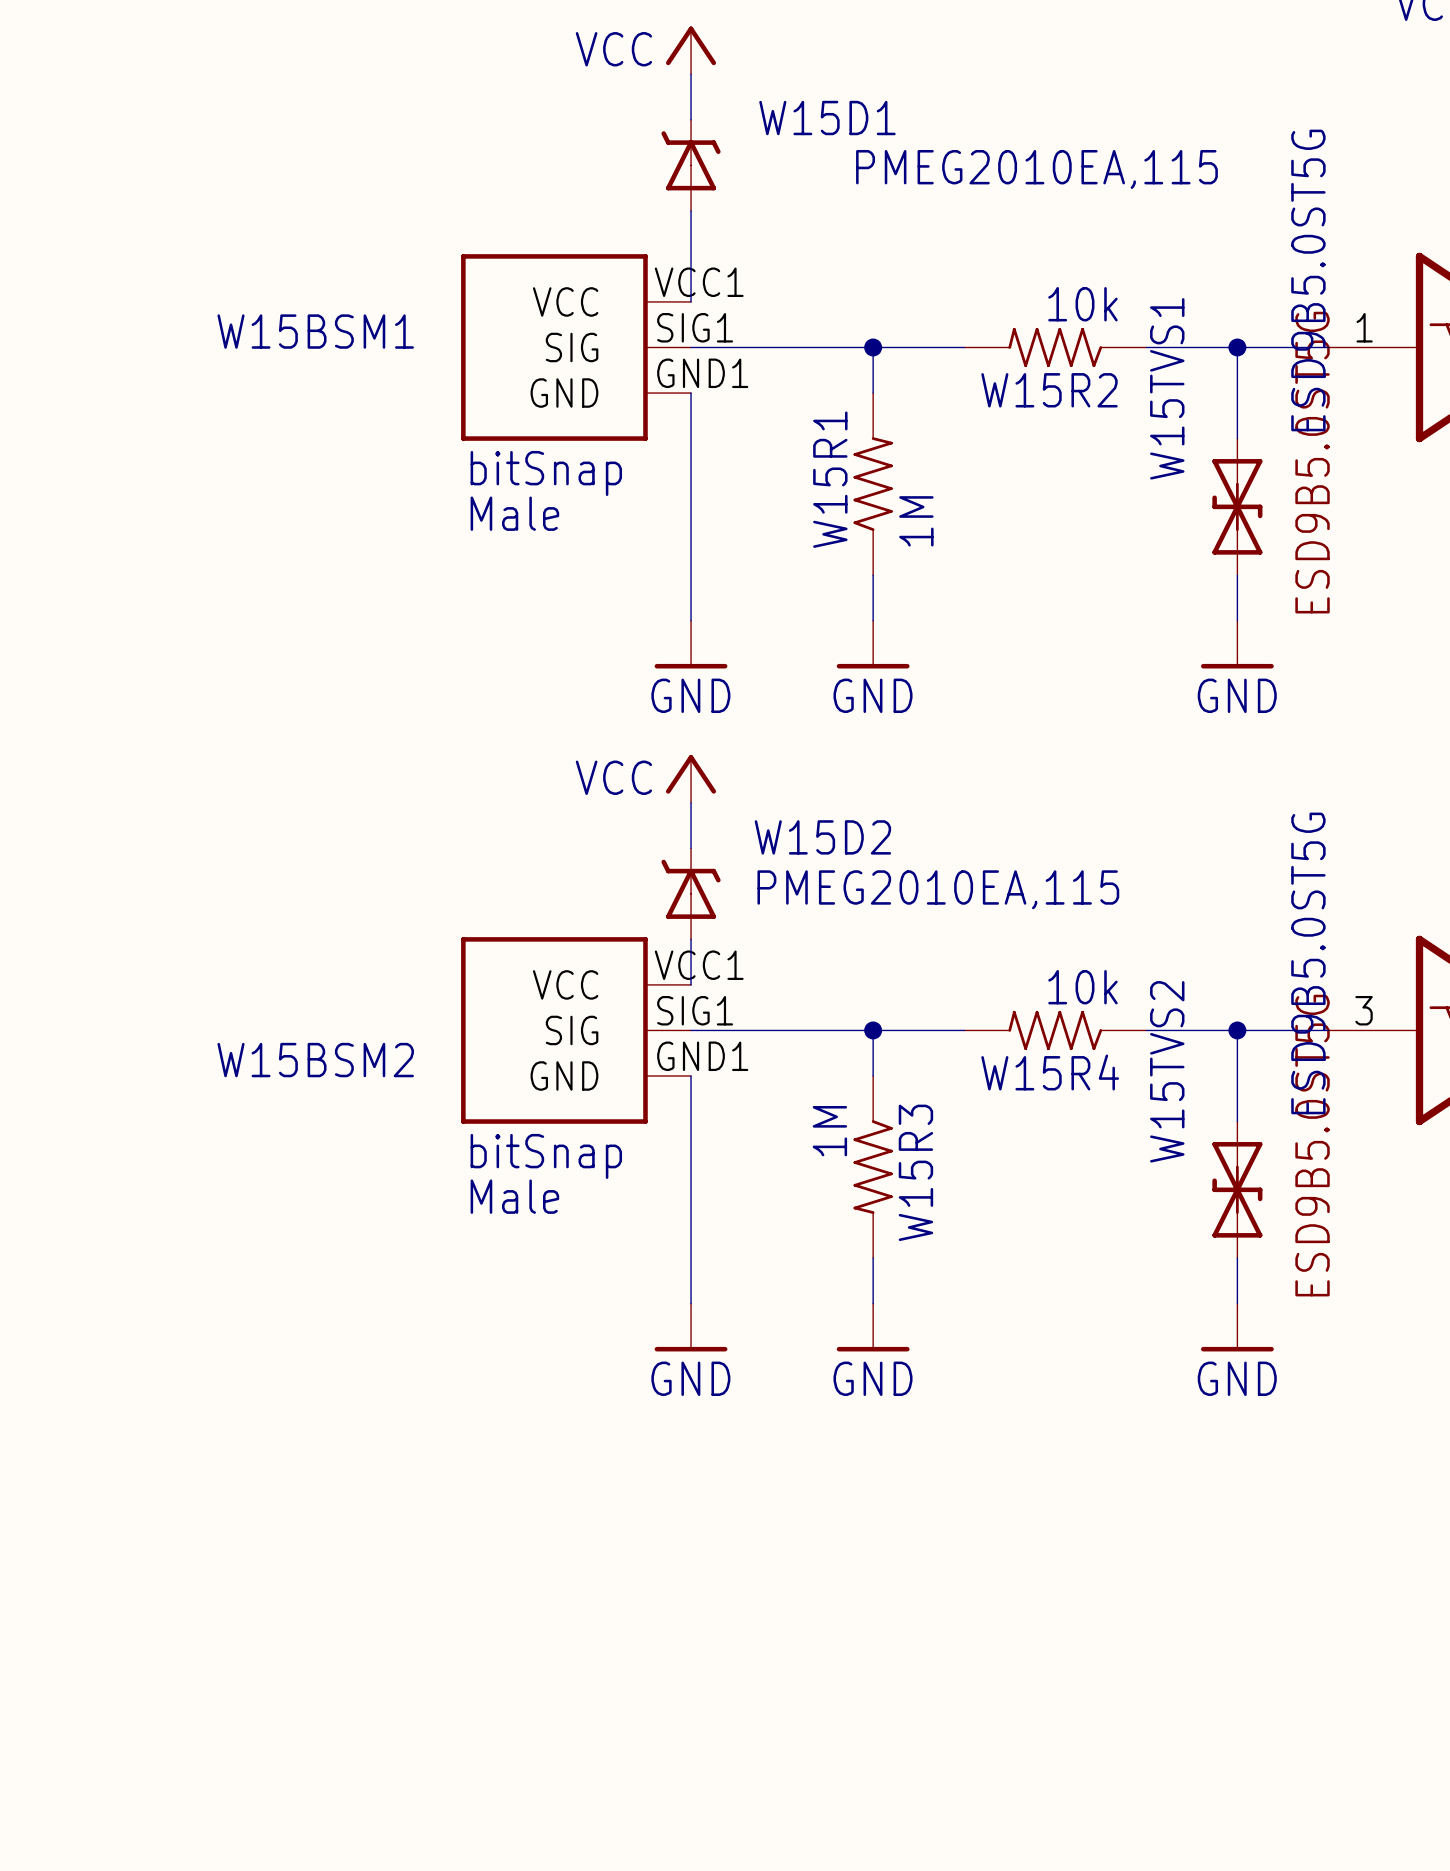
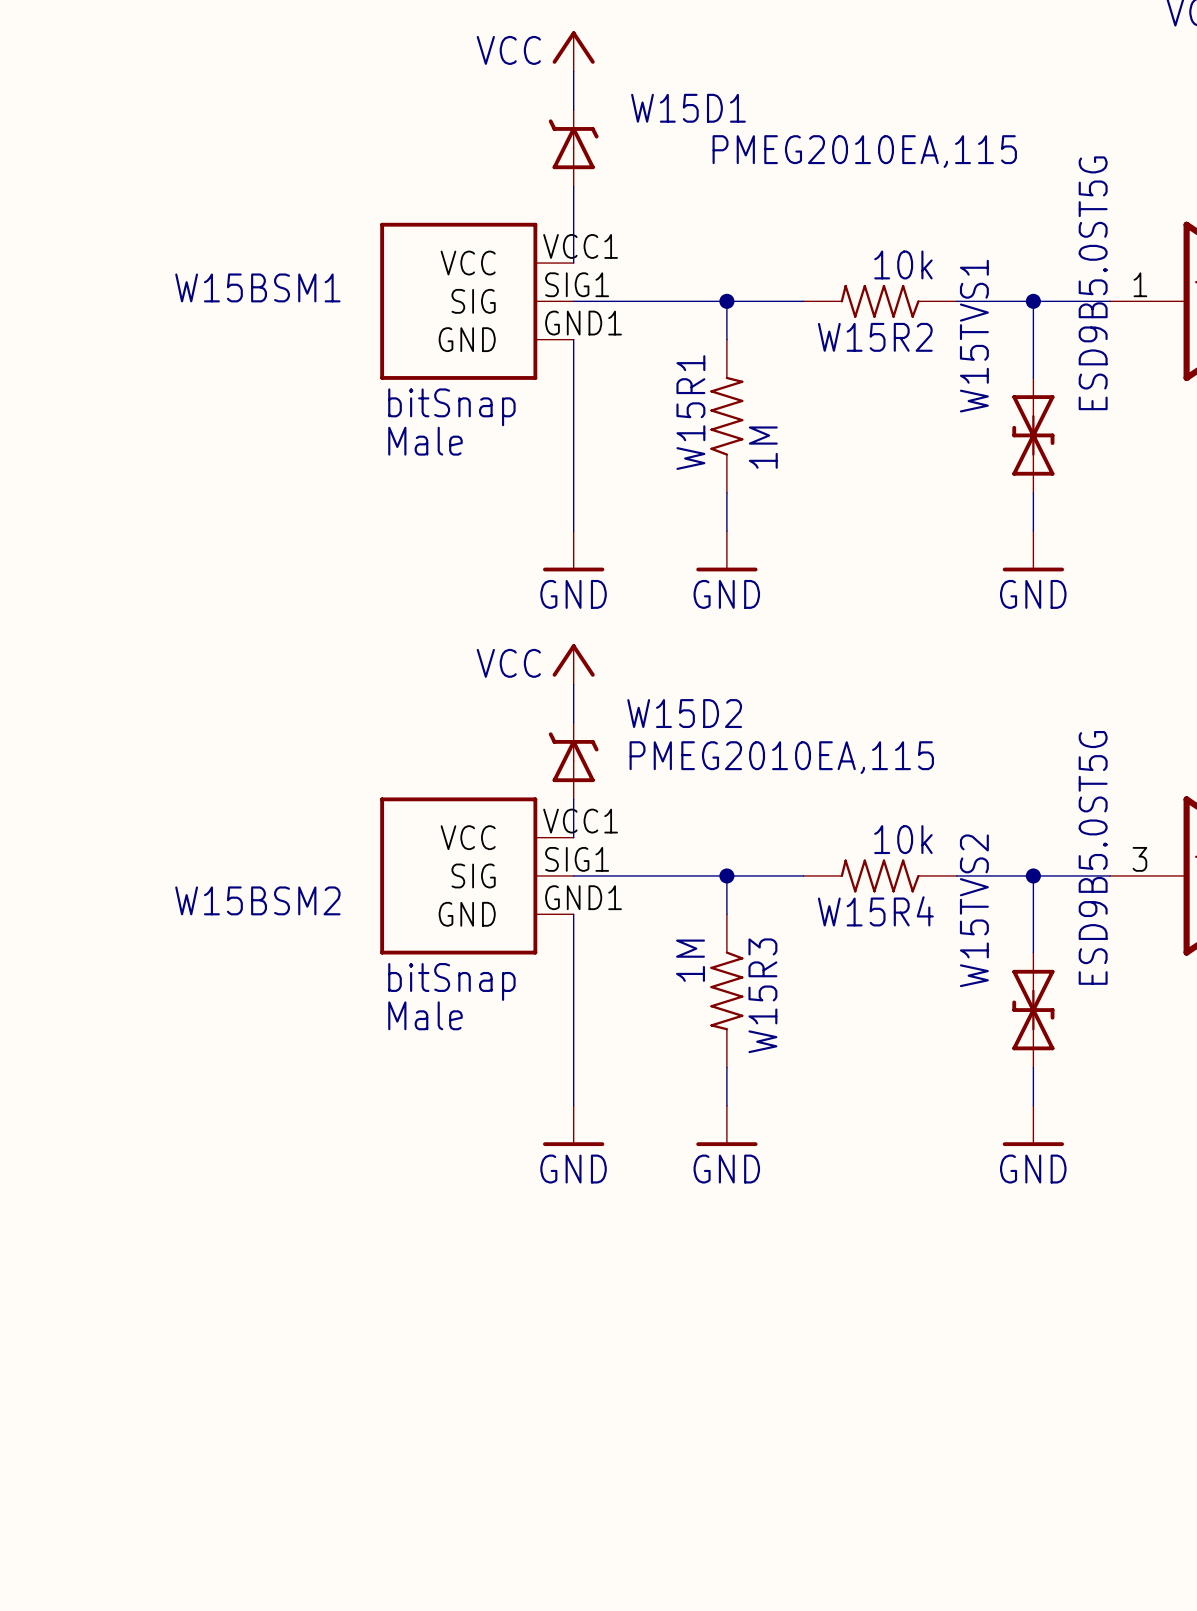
W15TVS1 value position: ESD9B5.0ST5G (1308, 280) -> ESD9B5.0ST5G (1093, 283)
W15TVS1 text: ESD9B5.0ST5G (1312, 462) -> none
W15TVS2 value position: ESD9B5.0ST5G (1308, 963) -> ESD9B5.0ST5G (1093, 857)
W15TVS2 text: ESD9B5.0ST5G (1312, 1145) -> none

